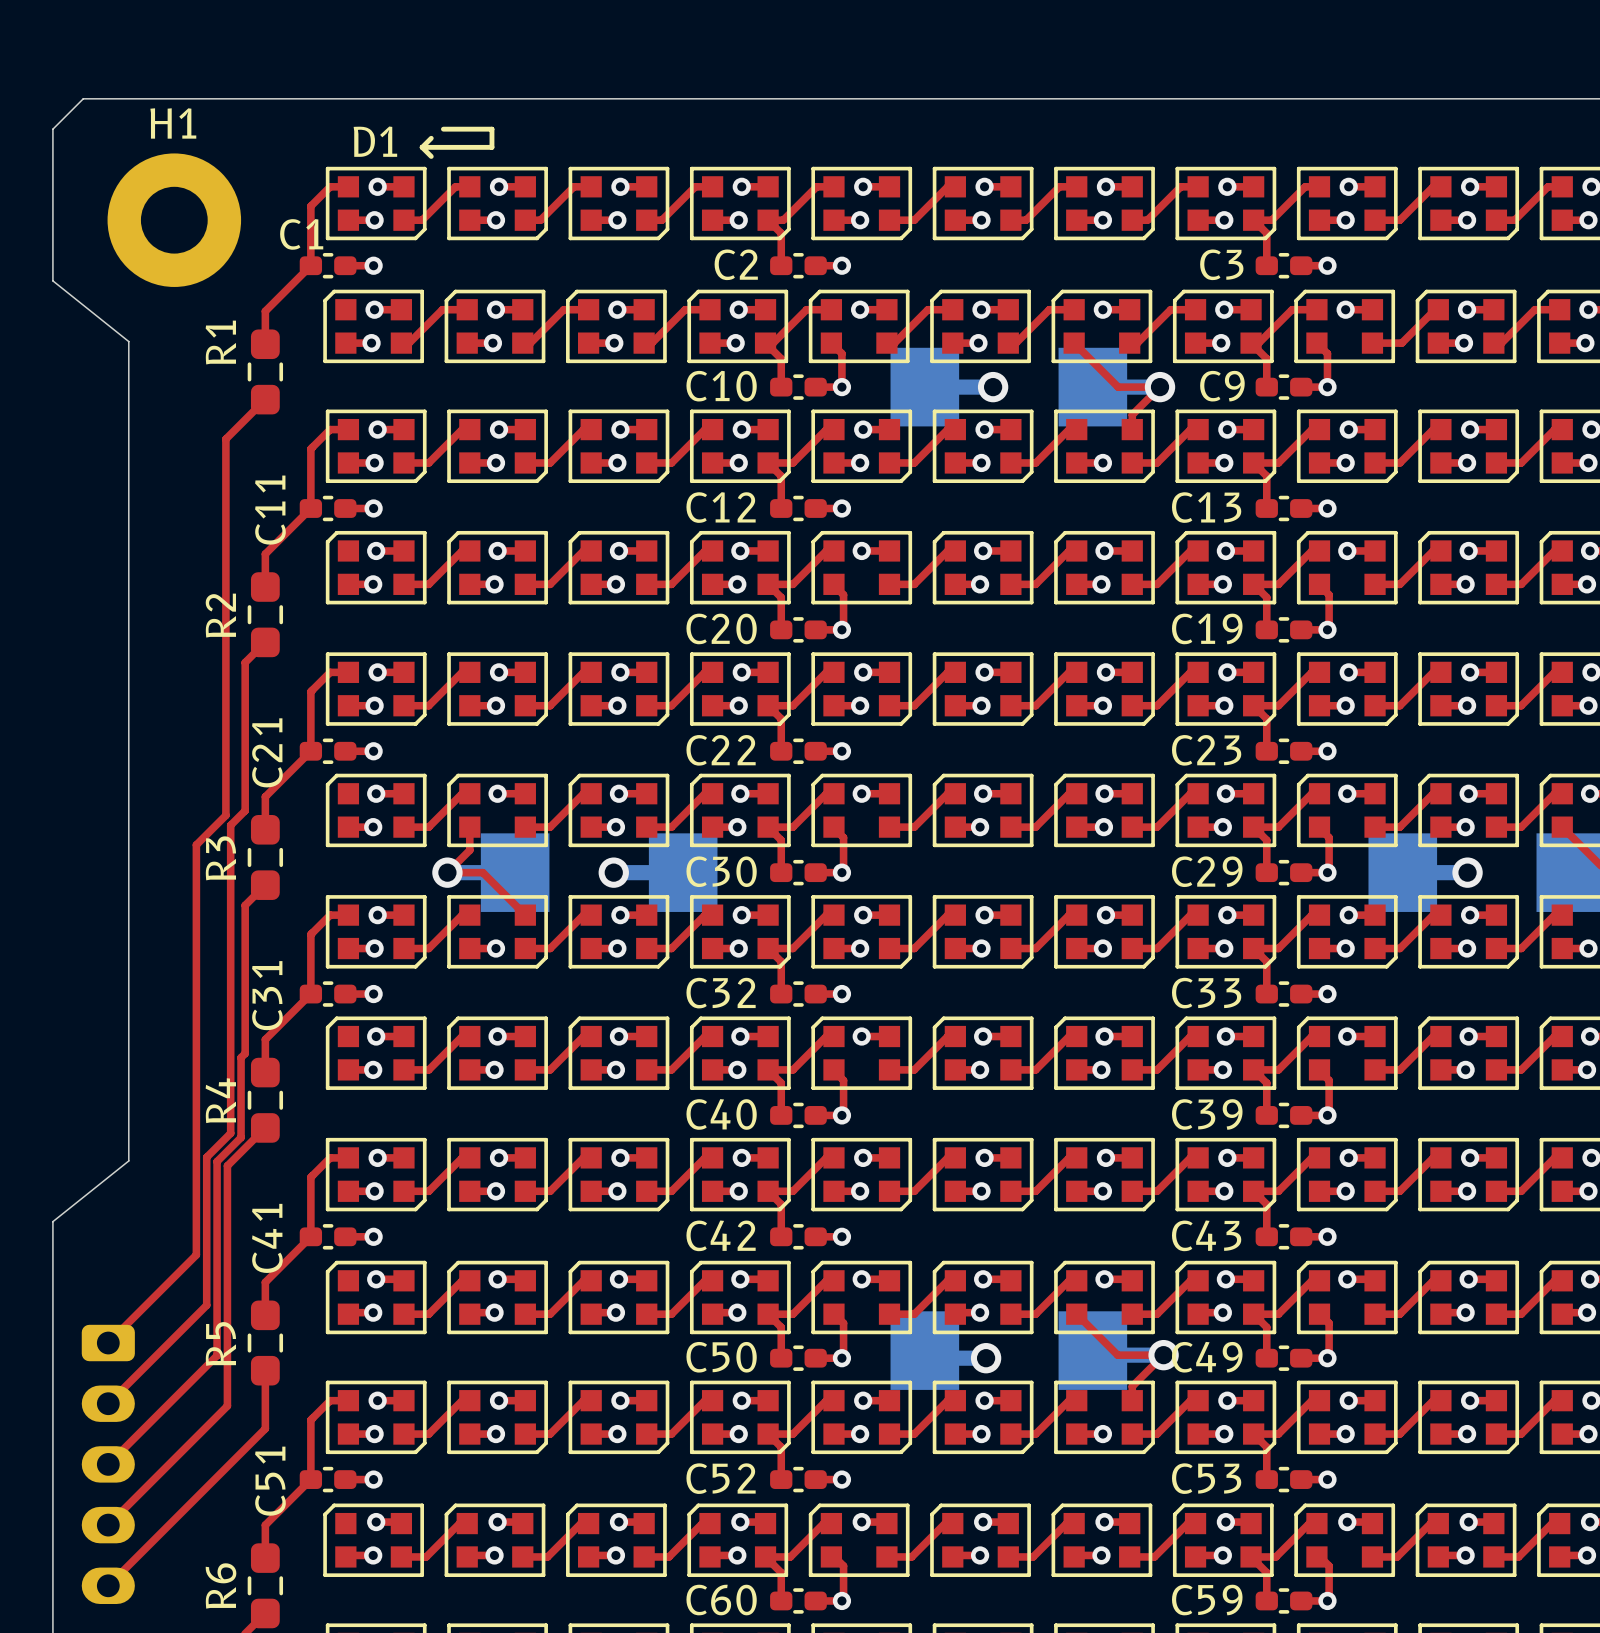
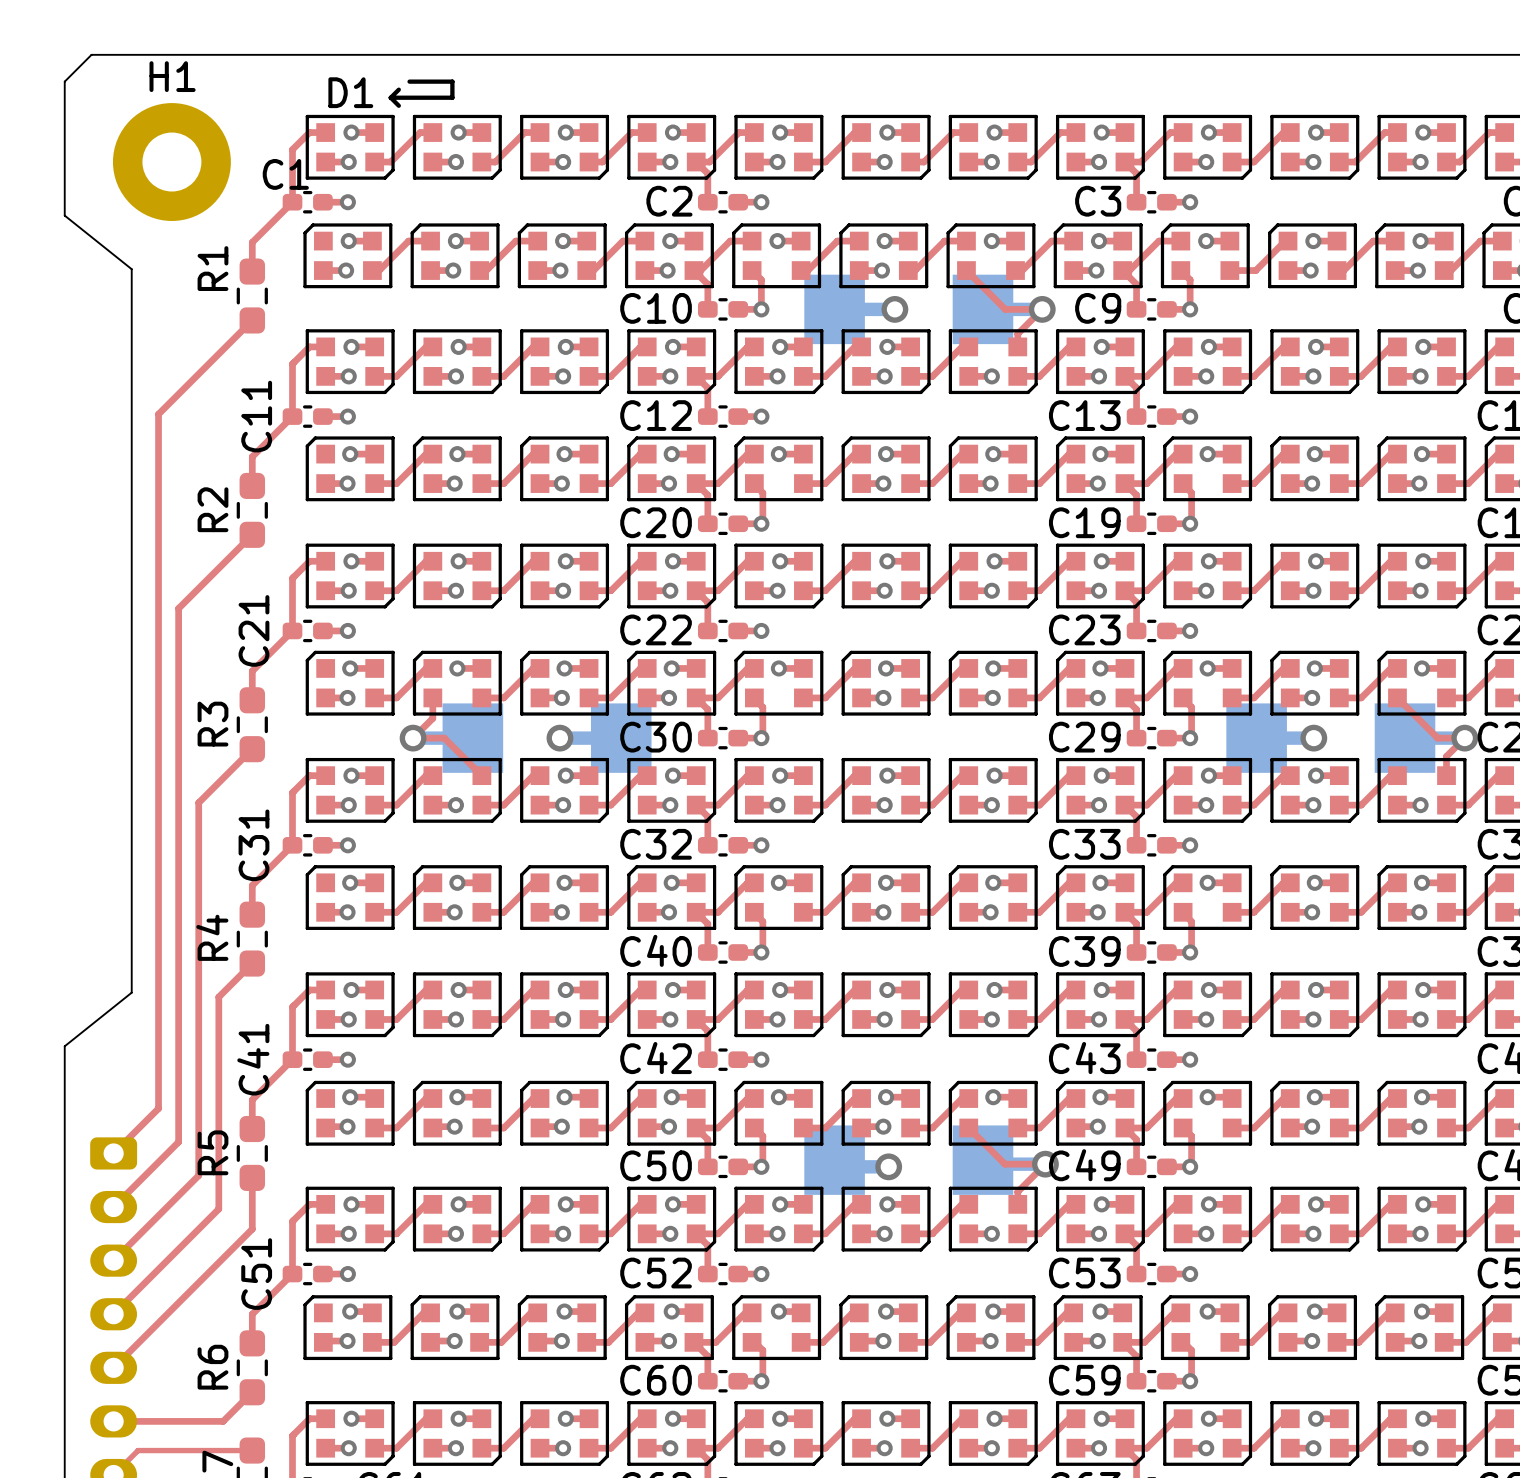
top track: (225, 439) (225, 815) (196, 844) (196, 1254) (159, 1292) -> (217, 355) (158, 414) (158, 1108)
top track: (245, 662) (245, 810) (230, 825) (230, 1133) (206, 1157) (206, 1305) (181, 1330) -> (234, 552) (178, 608) (178, 1142)
top track: (245, 905) (245, 1053) (241, 1057) (241, 1137) (217, 1161) (217, 1355) (204, 1368) -> (234, 767) (198, 802) (198, 1175)

